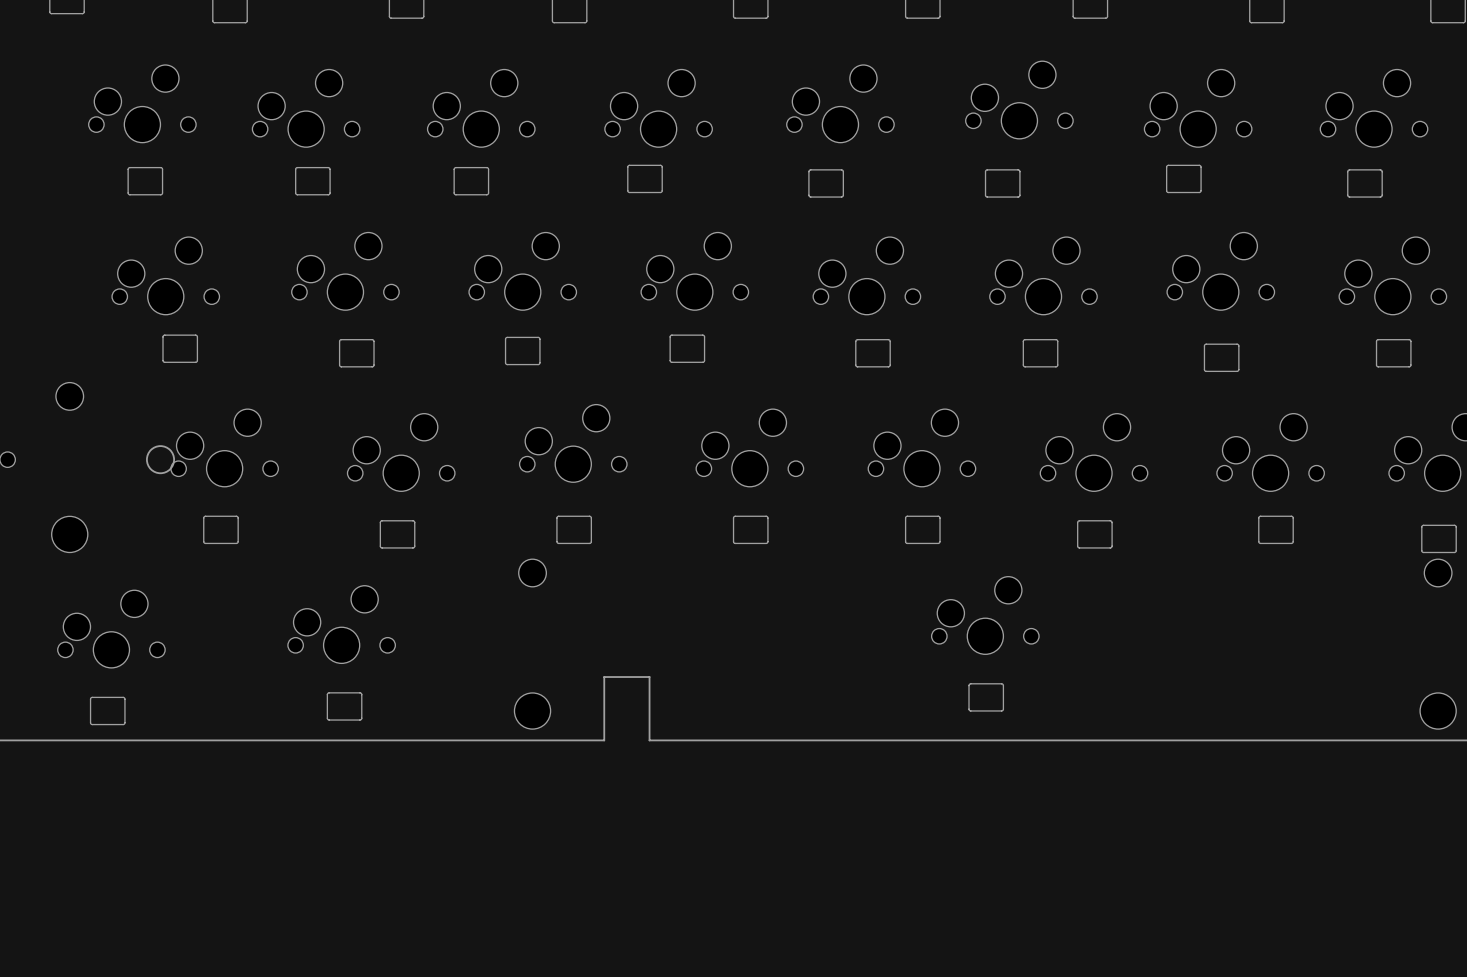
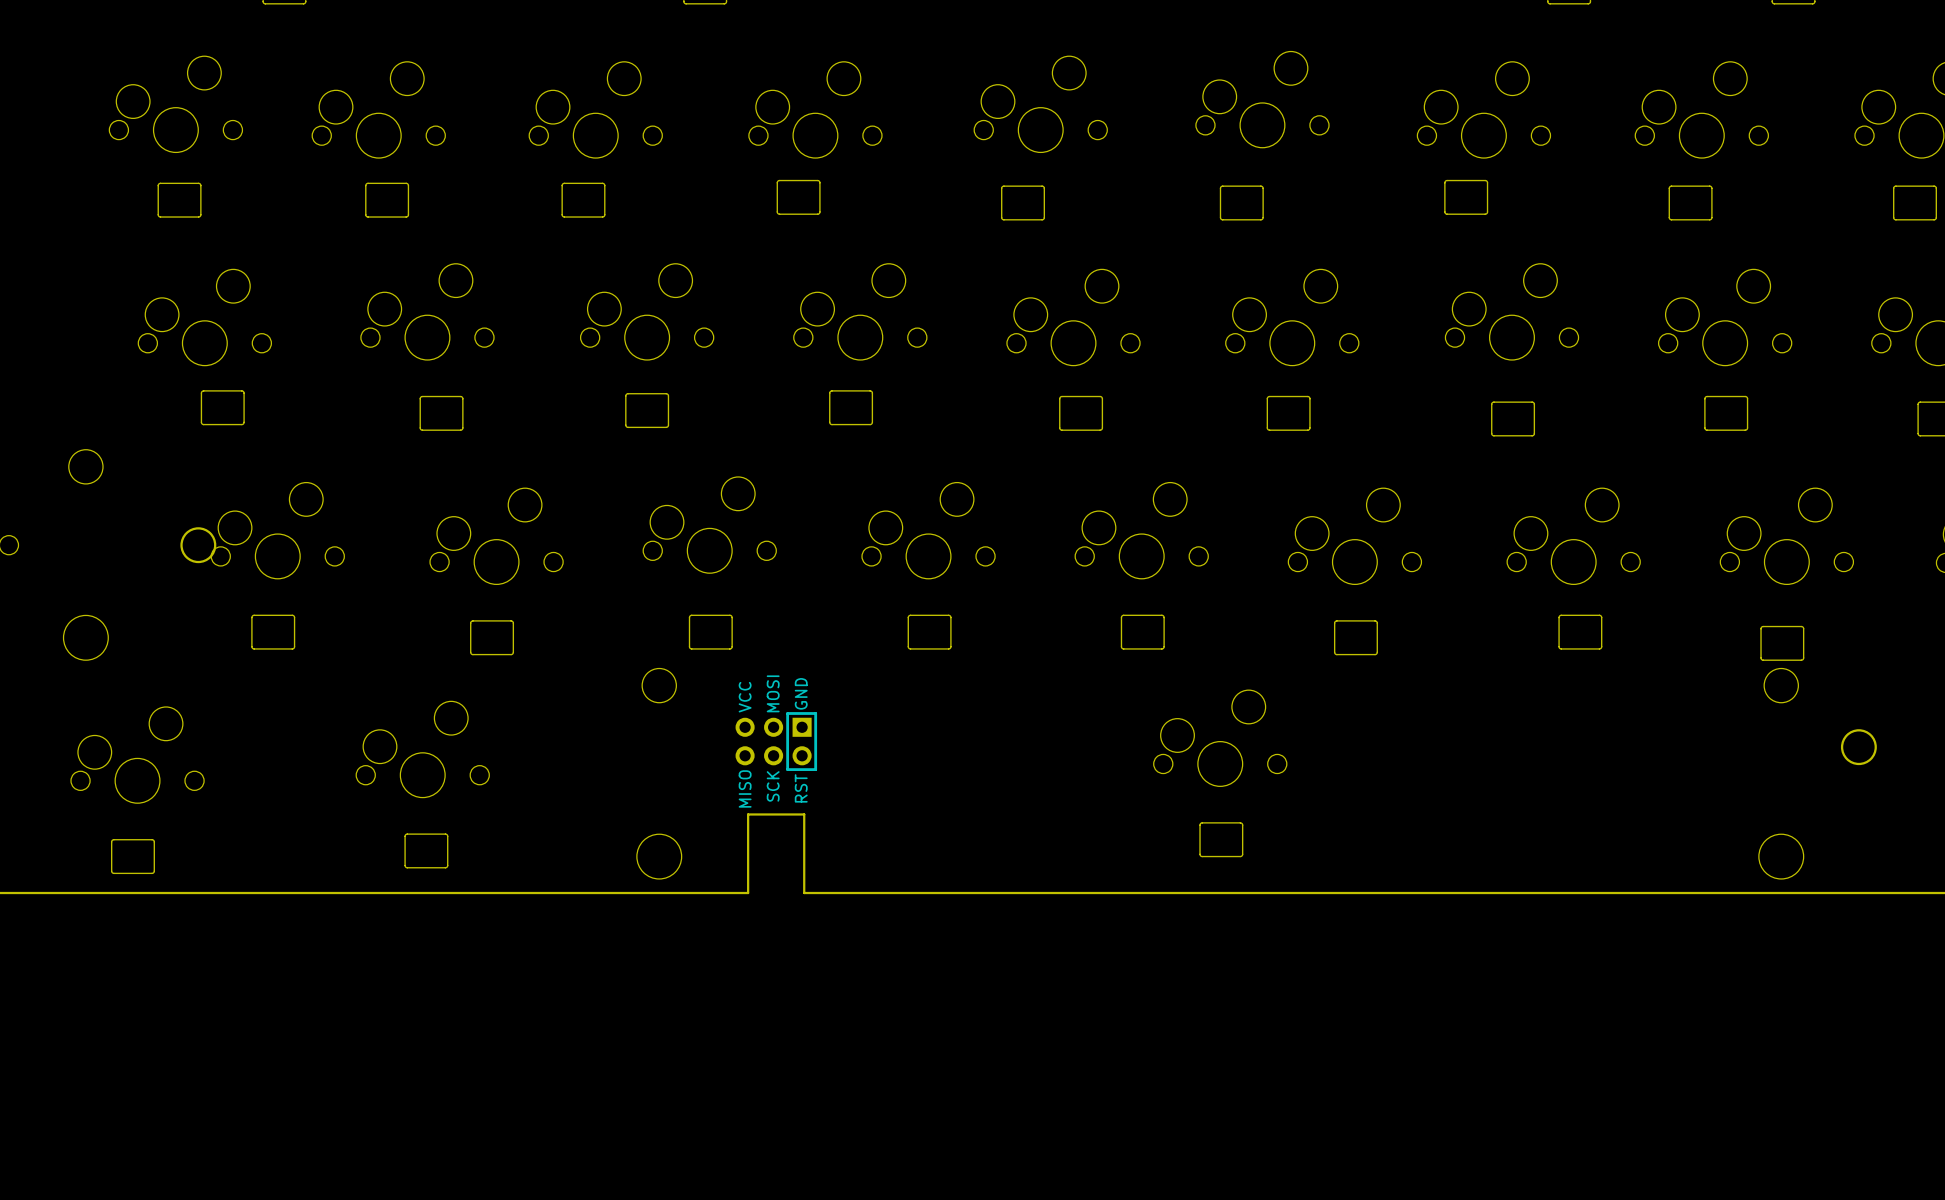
part: none -> (776, 741)

